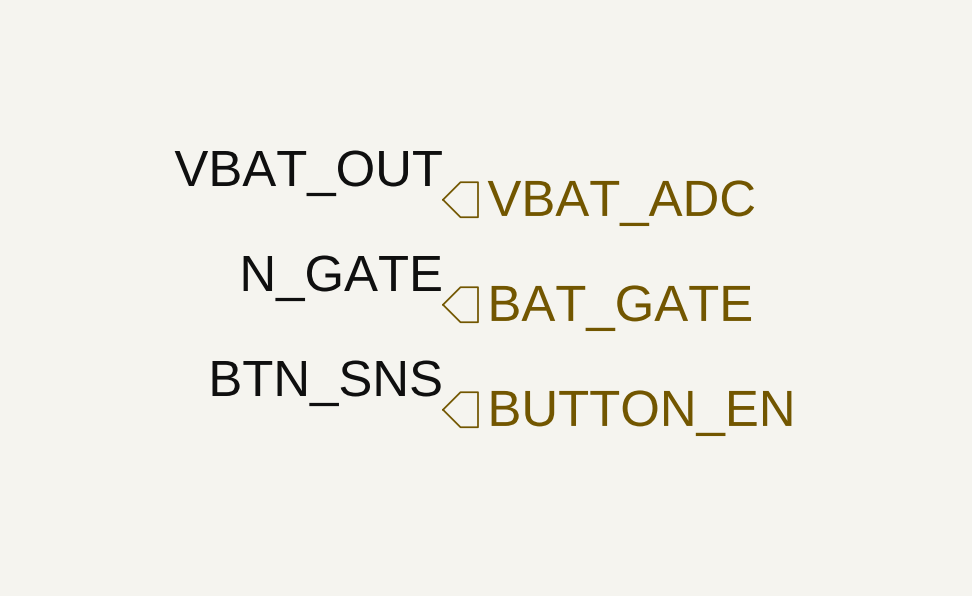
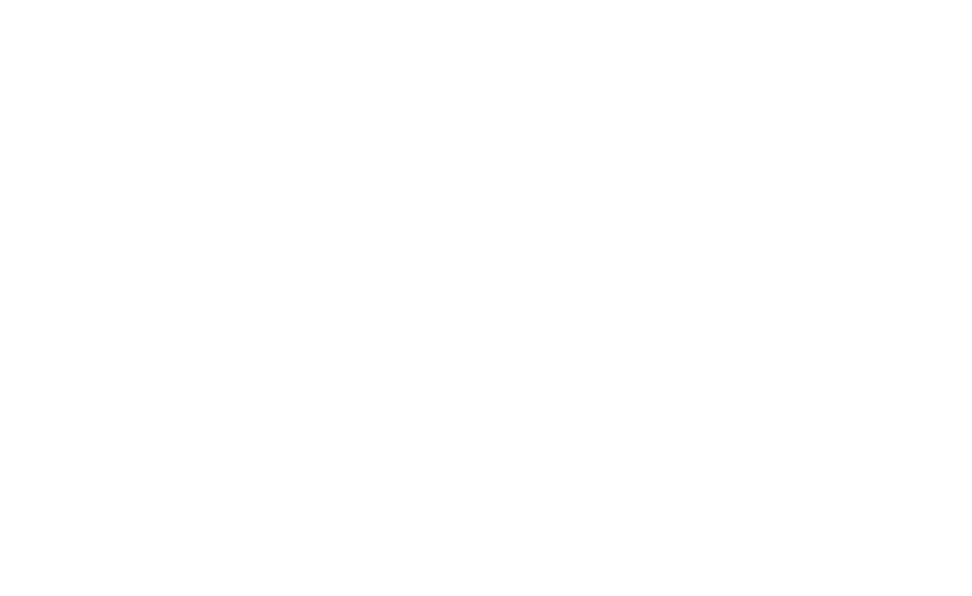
label: VBAT_OUT (308, 173) -> none
hierarchical label: VBAT_ADC (620, 203) -> none
label: N_GATE (342, 278) -> none
hierarchical label: BAT_GATE (621, 308) -> none
label: BTN_SNS (326, 383) -> none
hierarchical label: BUTTON_EN (641, 413) -> none

